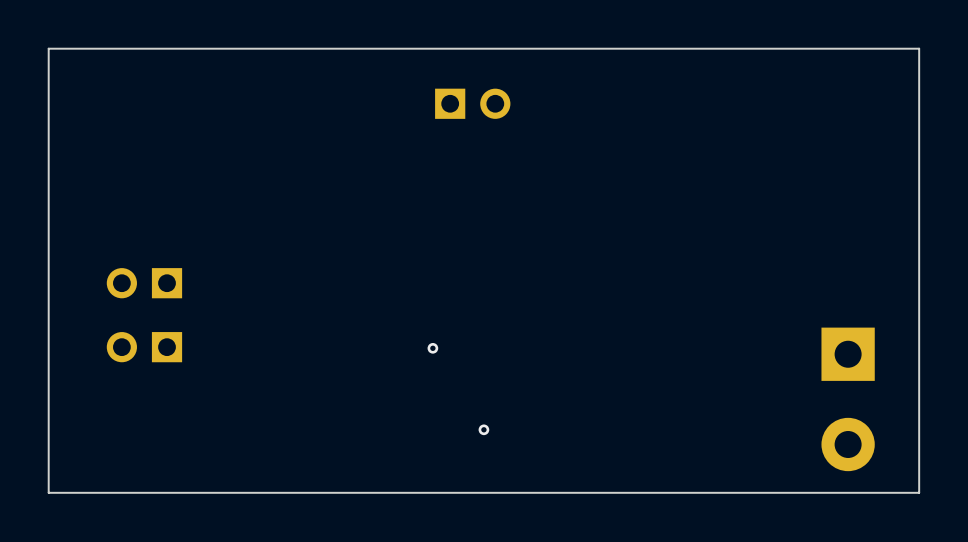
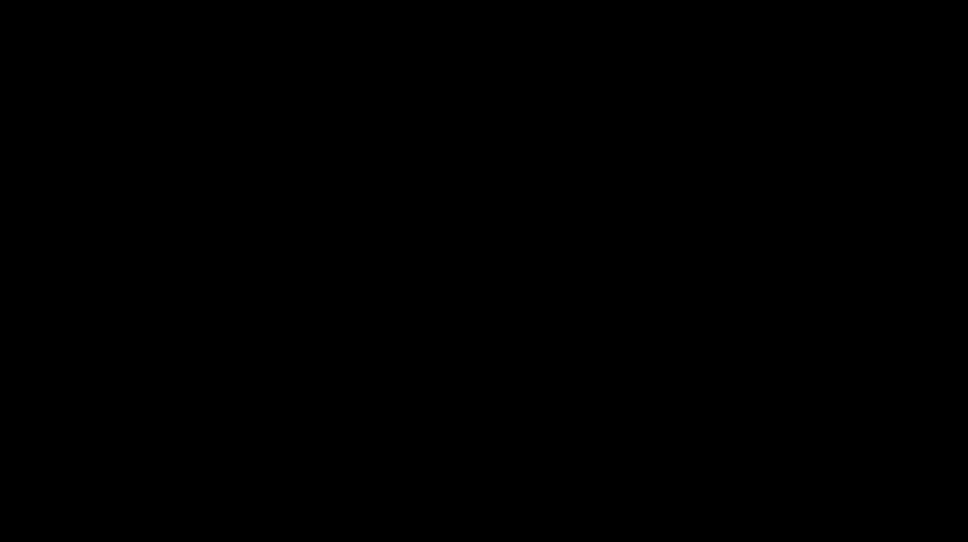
board edge: (919, 48) (48, 48) (48, 492) (919, 492) (919, 48) -> none
part: (472, 103) -> none
part: (144, 283) -> none
part: (144, 347) -> none
via: (432, 348) -> none
part: (848, 399) -> none
via: (483, 429) -> none

